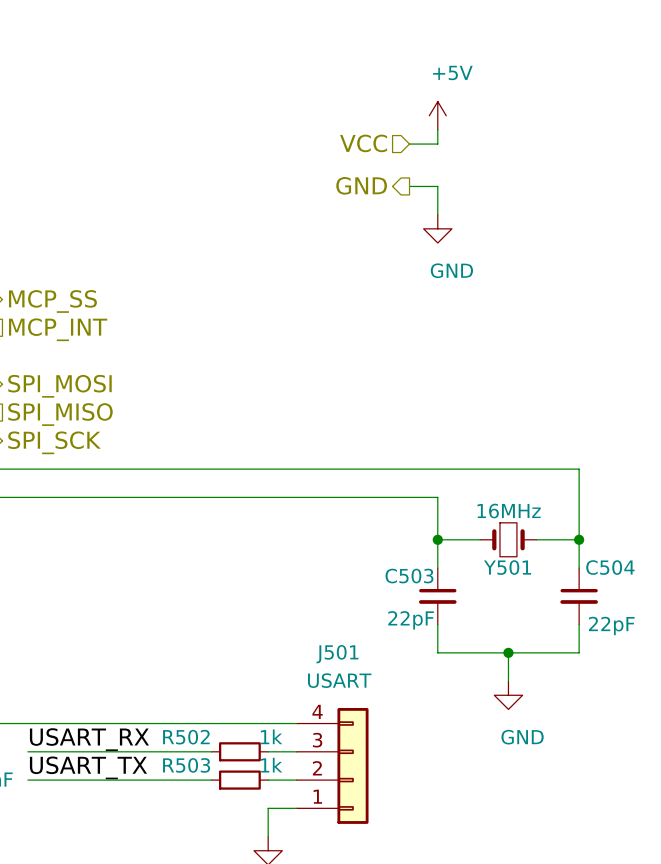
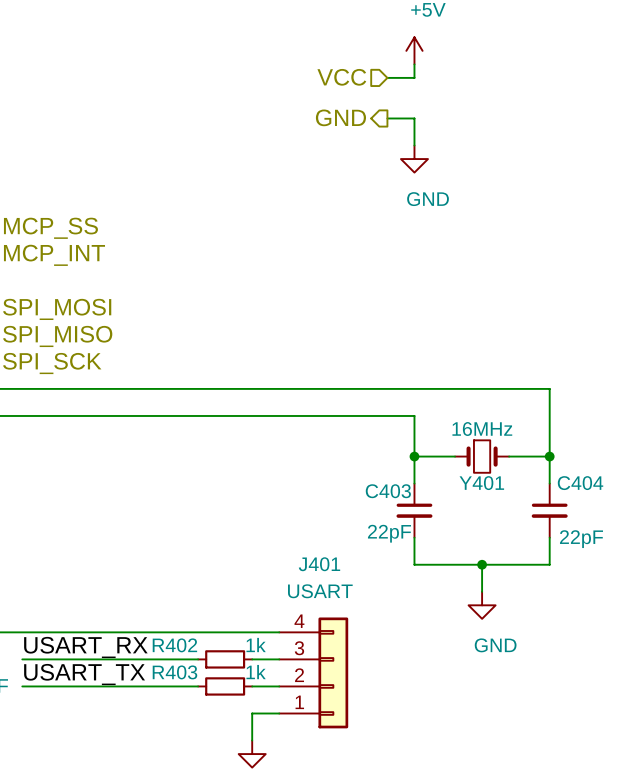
Y501 name: Y501 (507, 567) -> Y401 (481, 483)
C504 name: C504 (610, 567) -> C404 (580, 483)
C503 name: C503 (409, 576) -> C403 (388, 491)
J501 name: J501 (337, 654) -> J401 (319, 564)
R502 name: R502 (186, 737) -> R402 (174, 645)
R503 name: R503 (186, 765) -> R403 (174, 672)

